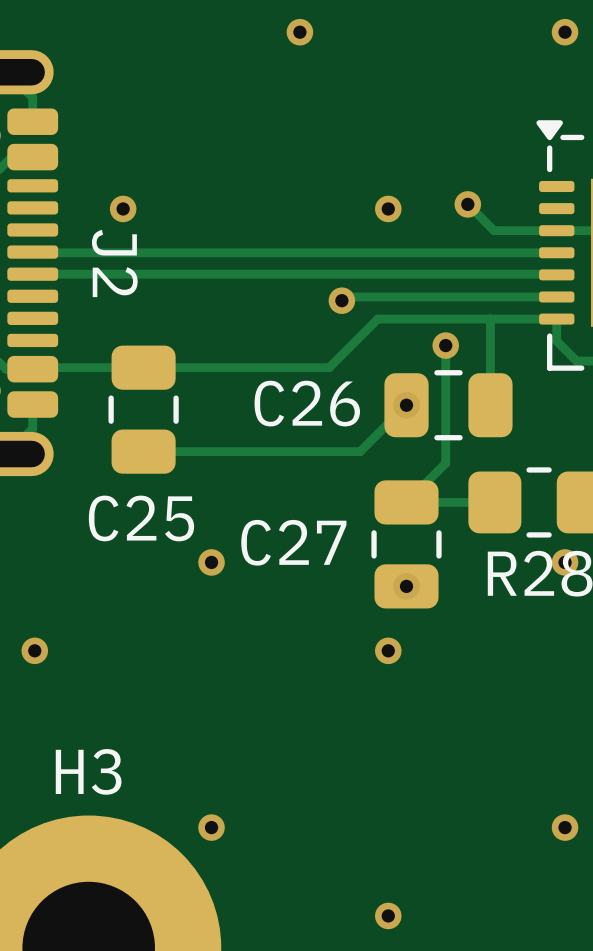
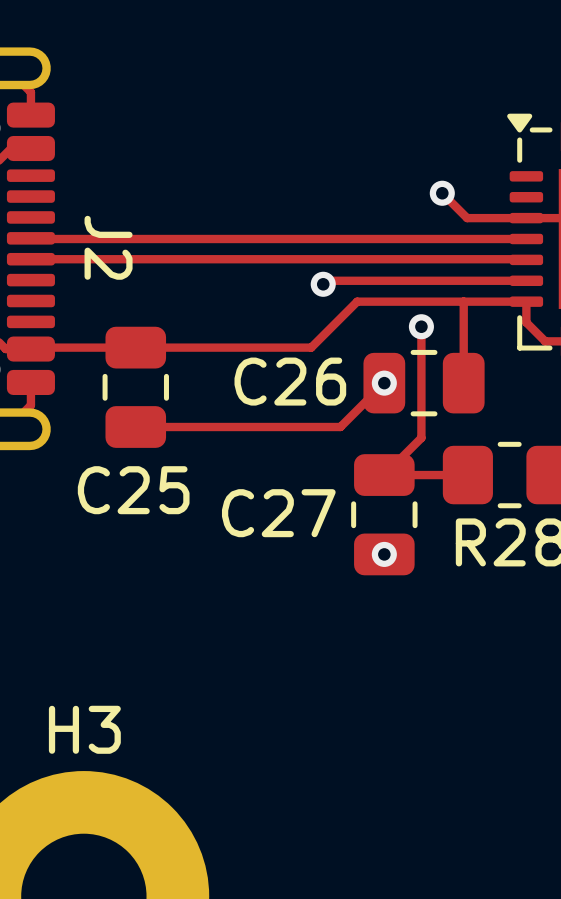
via: (299, 32) -> none
via: (565, 32) -> none
via: (123, 208) -> none
via: (388, 208) -> none
via: (211, 562) -> none
via: (565, 562) -> none
via: (34, 650) -> none
via: (388, 650) -> none
via: (211, 827) -> none
via: (565, 827) -> none
via: (388, 915) -> none

